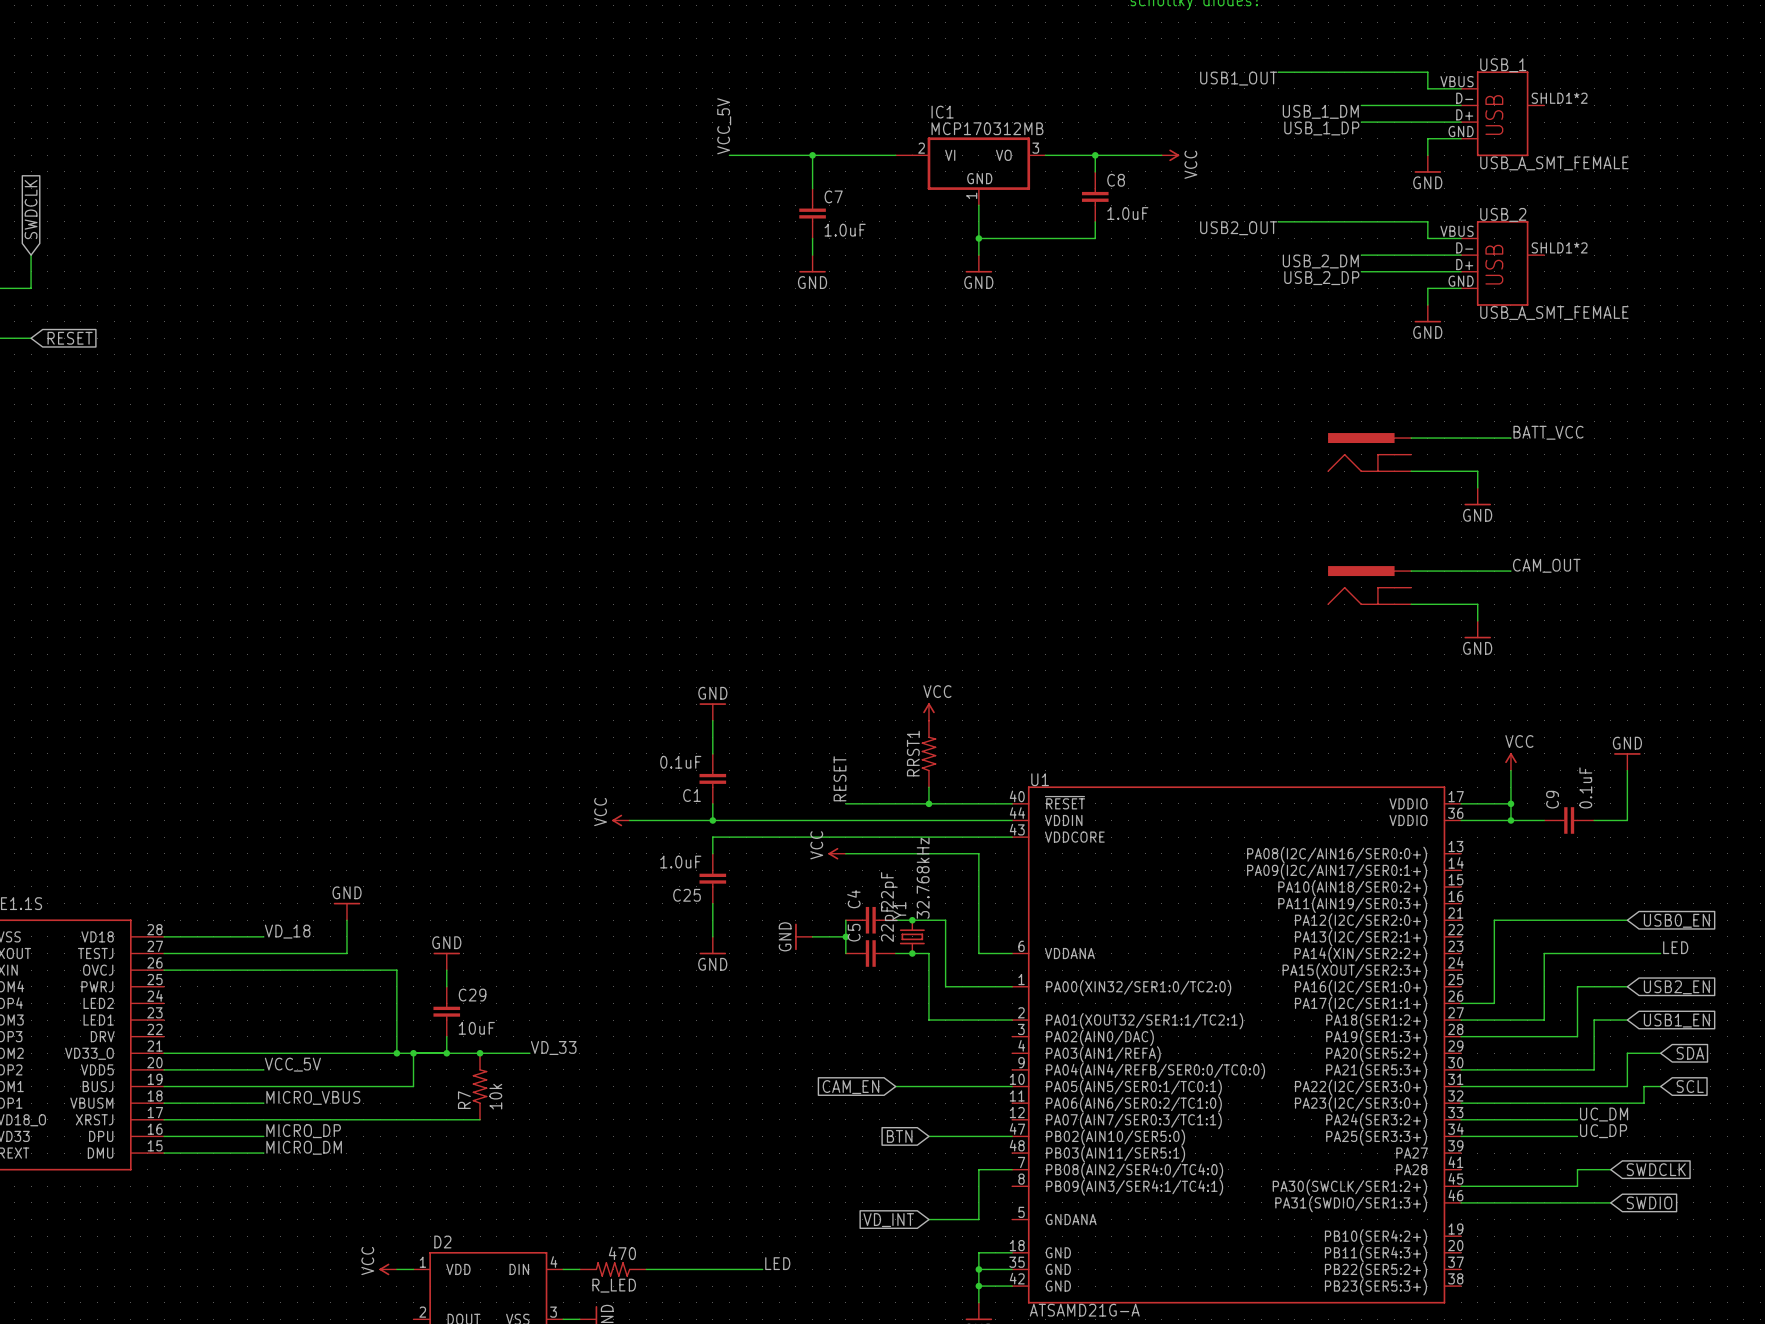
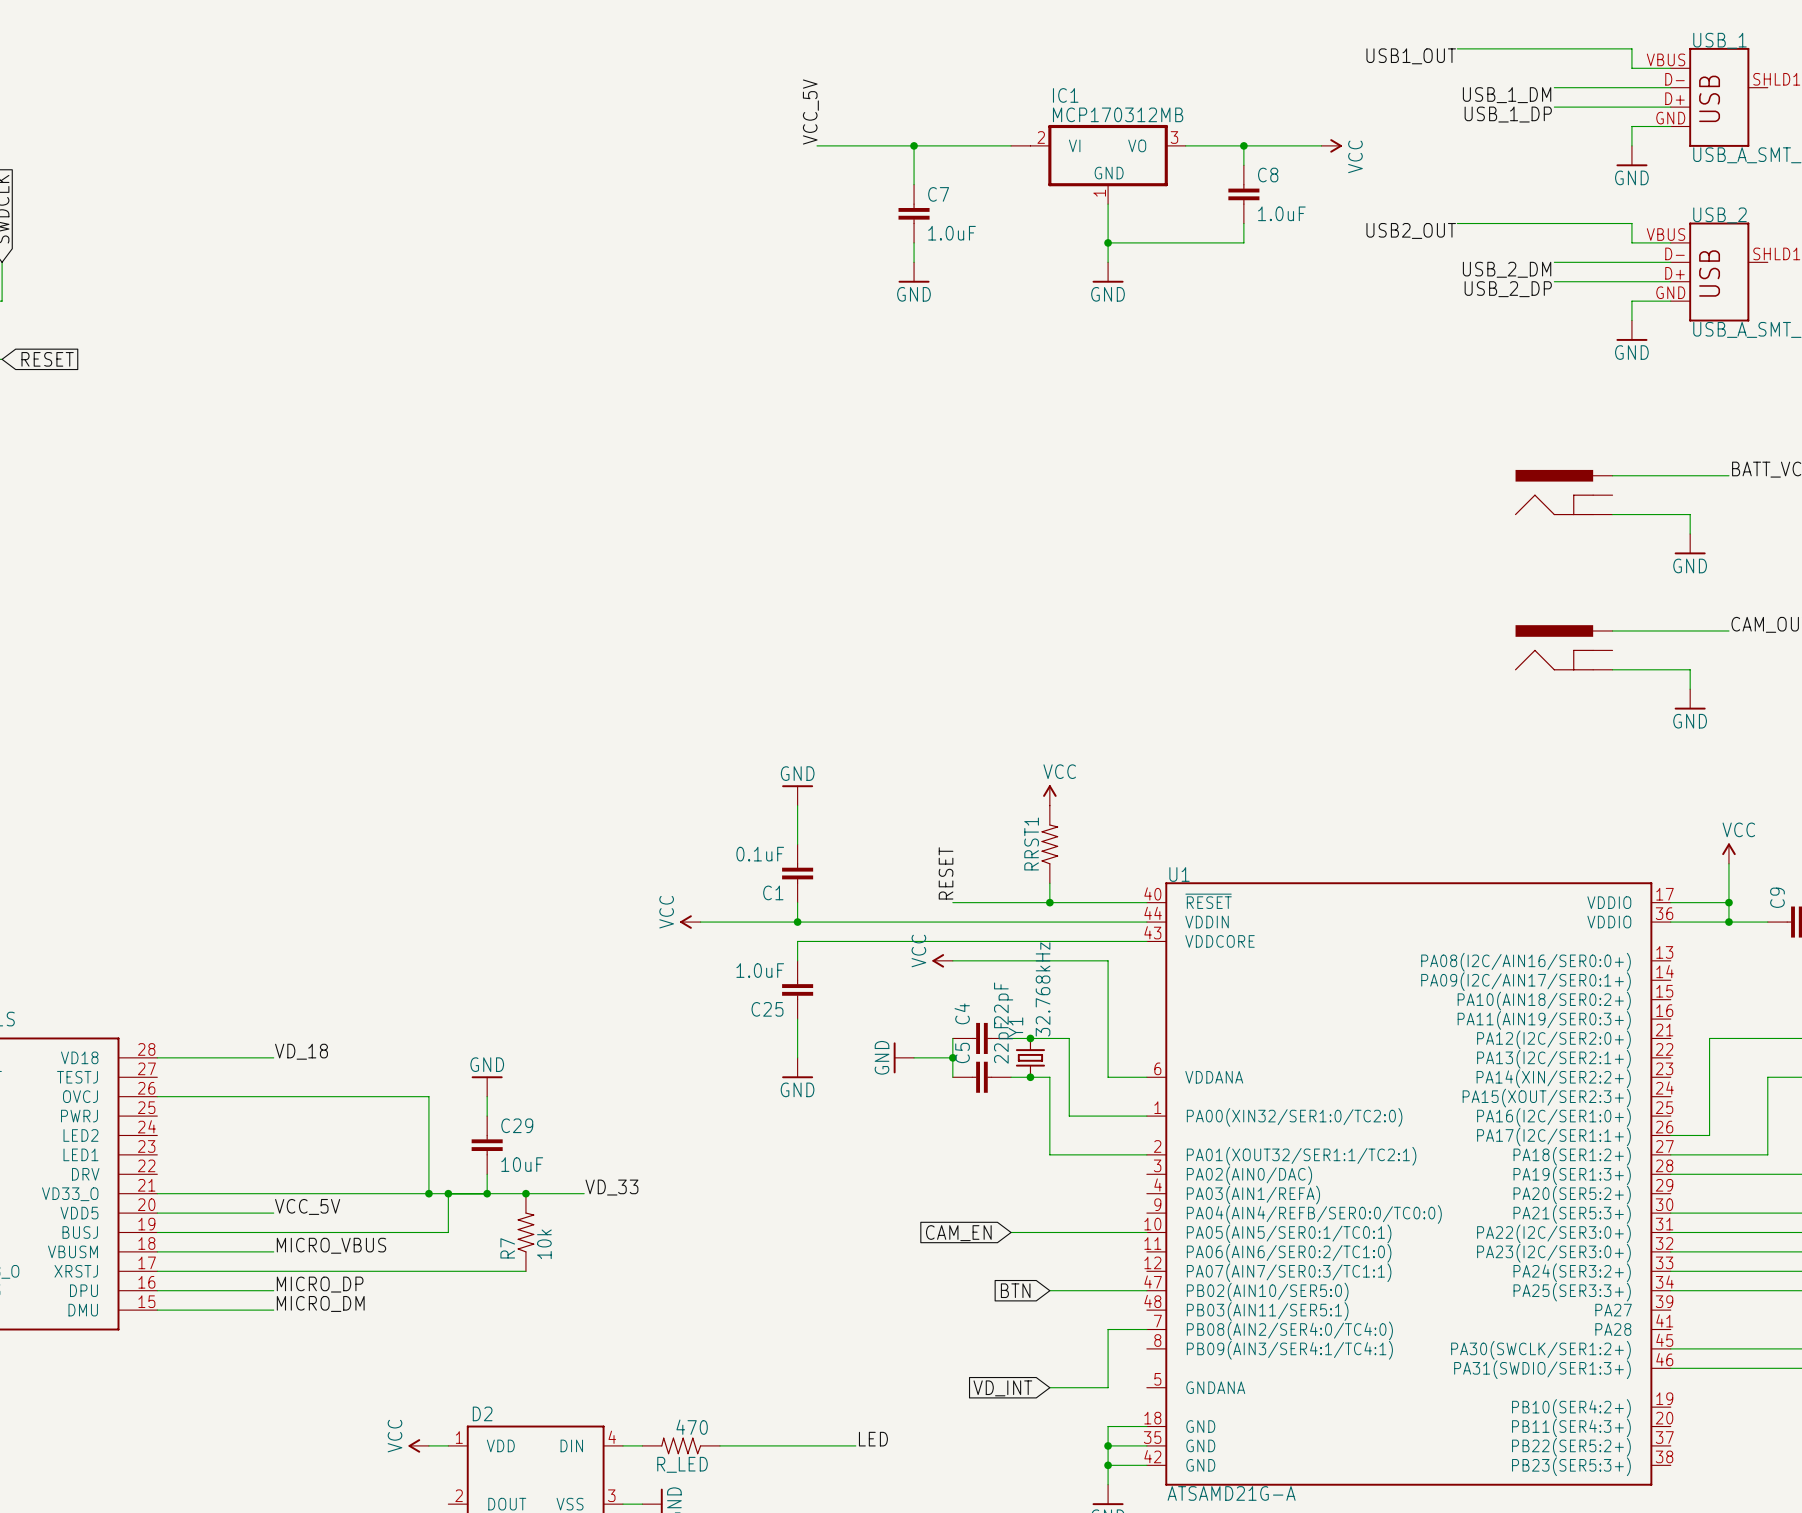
power symbol: GND (346, 911) -> none
wire: (346, 920) (346, 953) (164, 953) -> none

